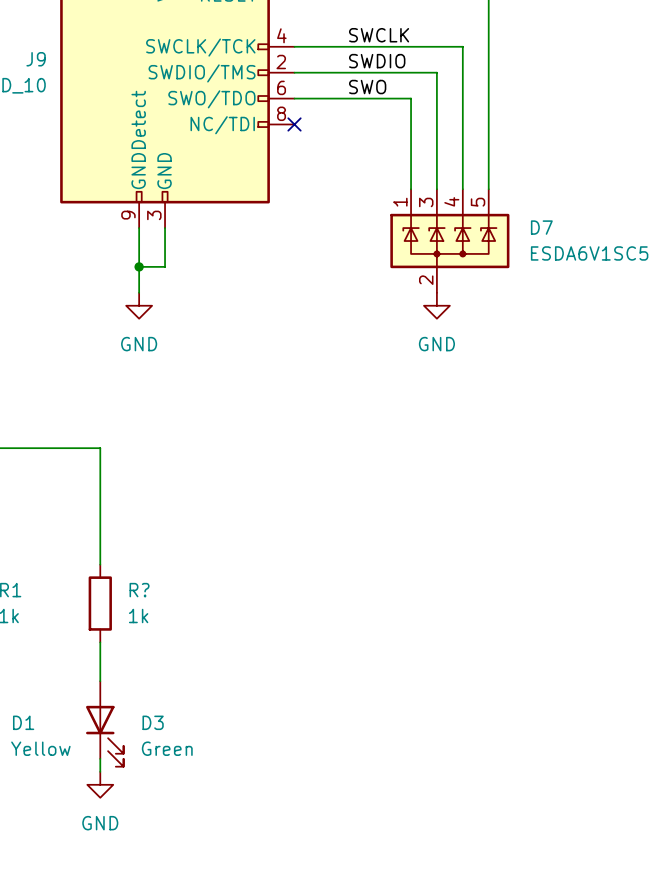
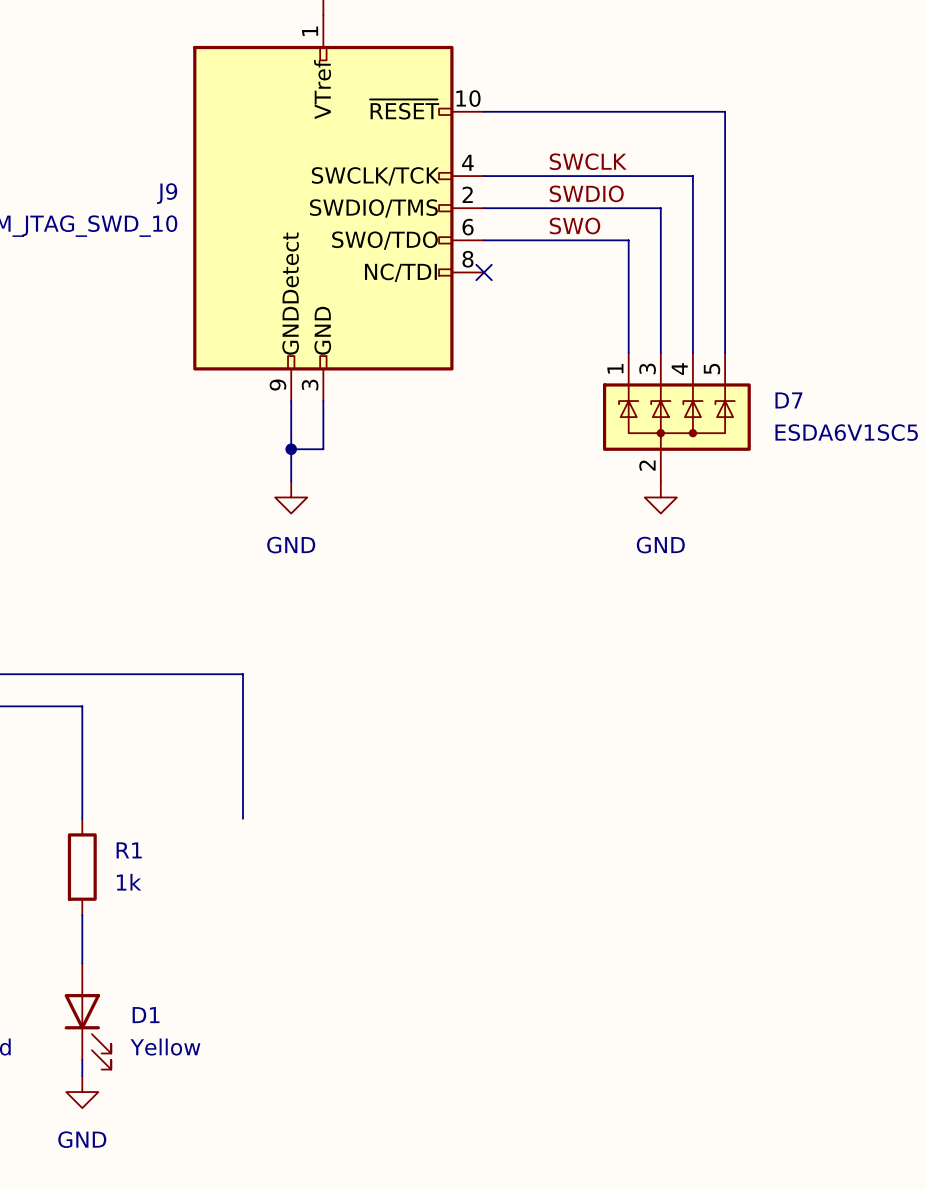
R?: 1k (100, 603) -> none
wire: (100, 642) (100, 681) -> none
D3: Green (104, 723) -> none
wire: (100, 758) (100, 771) -> none
power symbol: GND (100, 784) -> none

